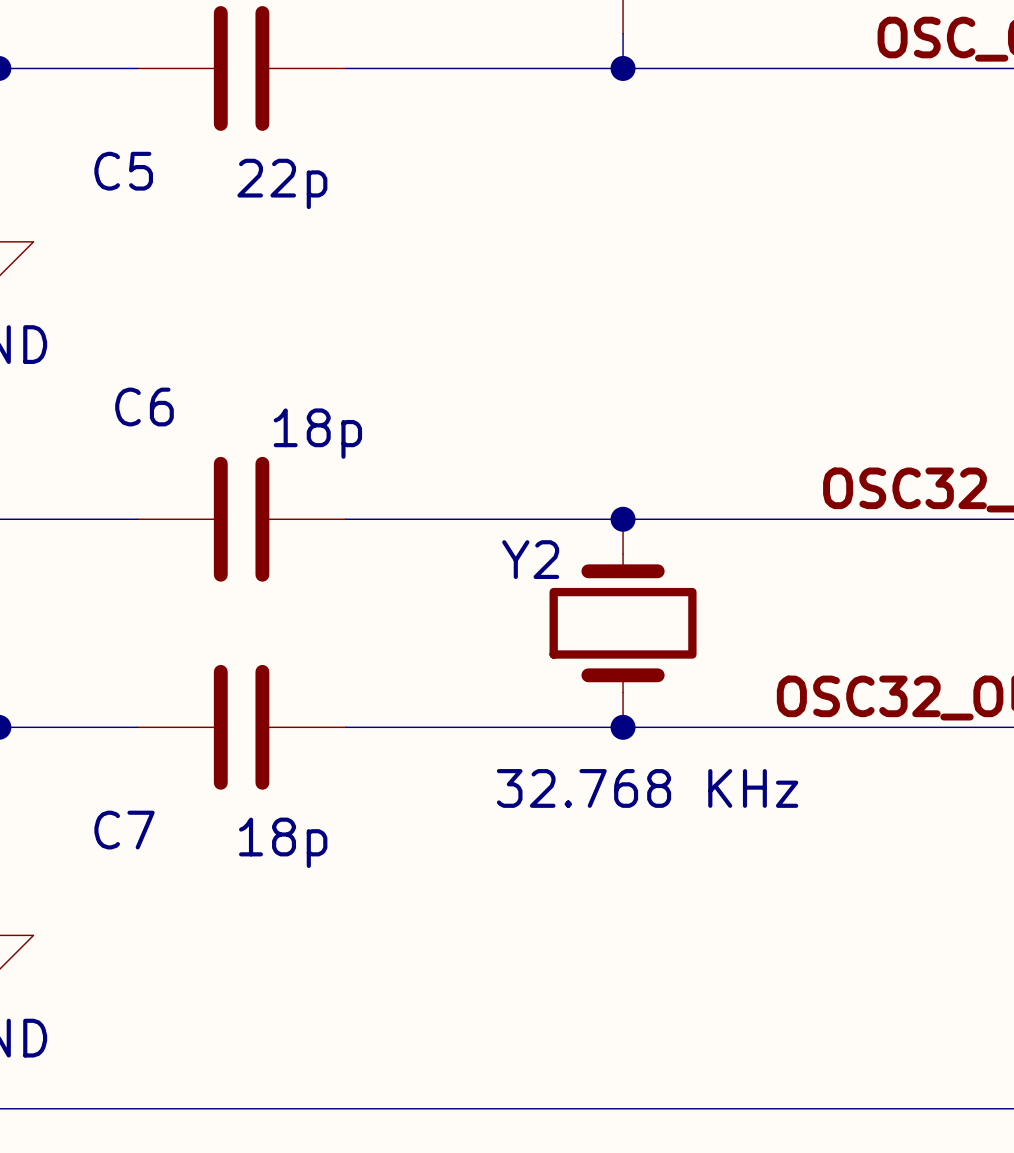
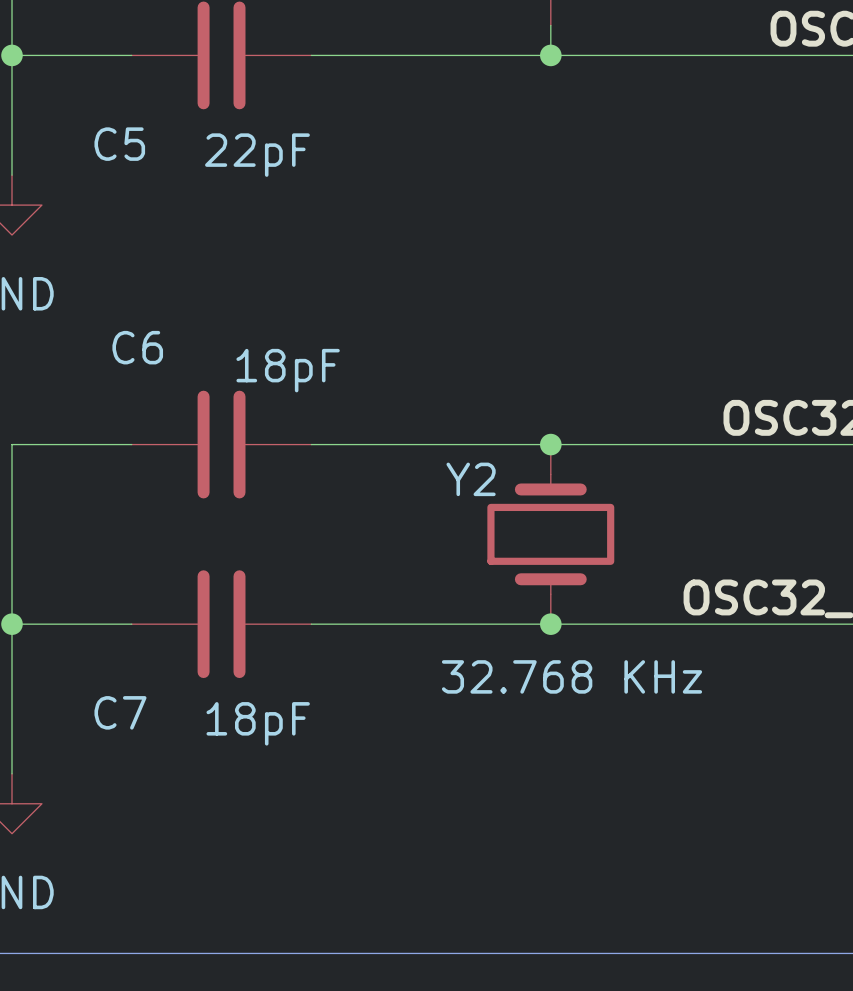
C5 value: 22p (282, 183) -> 22pF (257, 155)
C6 value: 18p (317, 433) -> 18pF (288, 370)
C7 value: 18p (283, 842) -> 18pF (258, 723)

